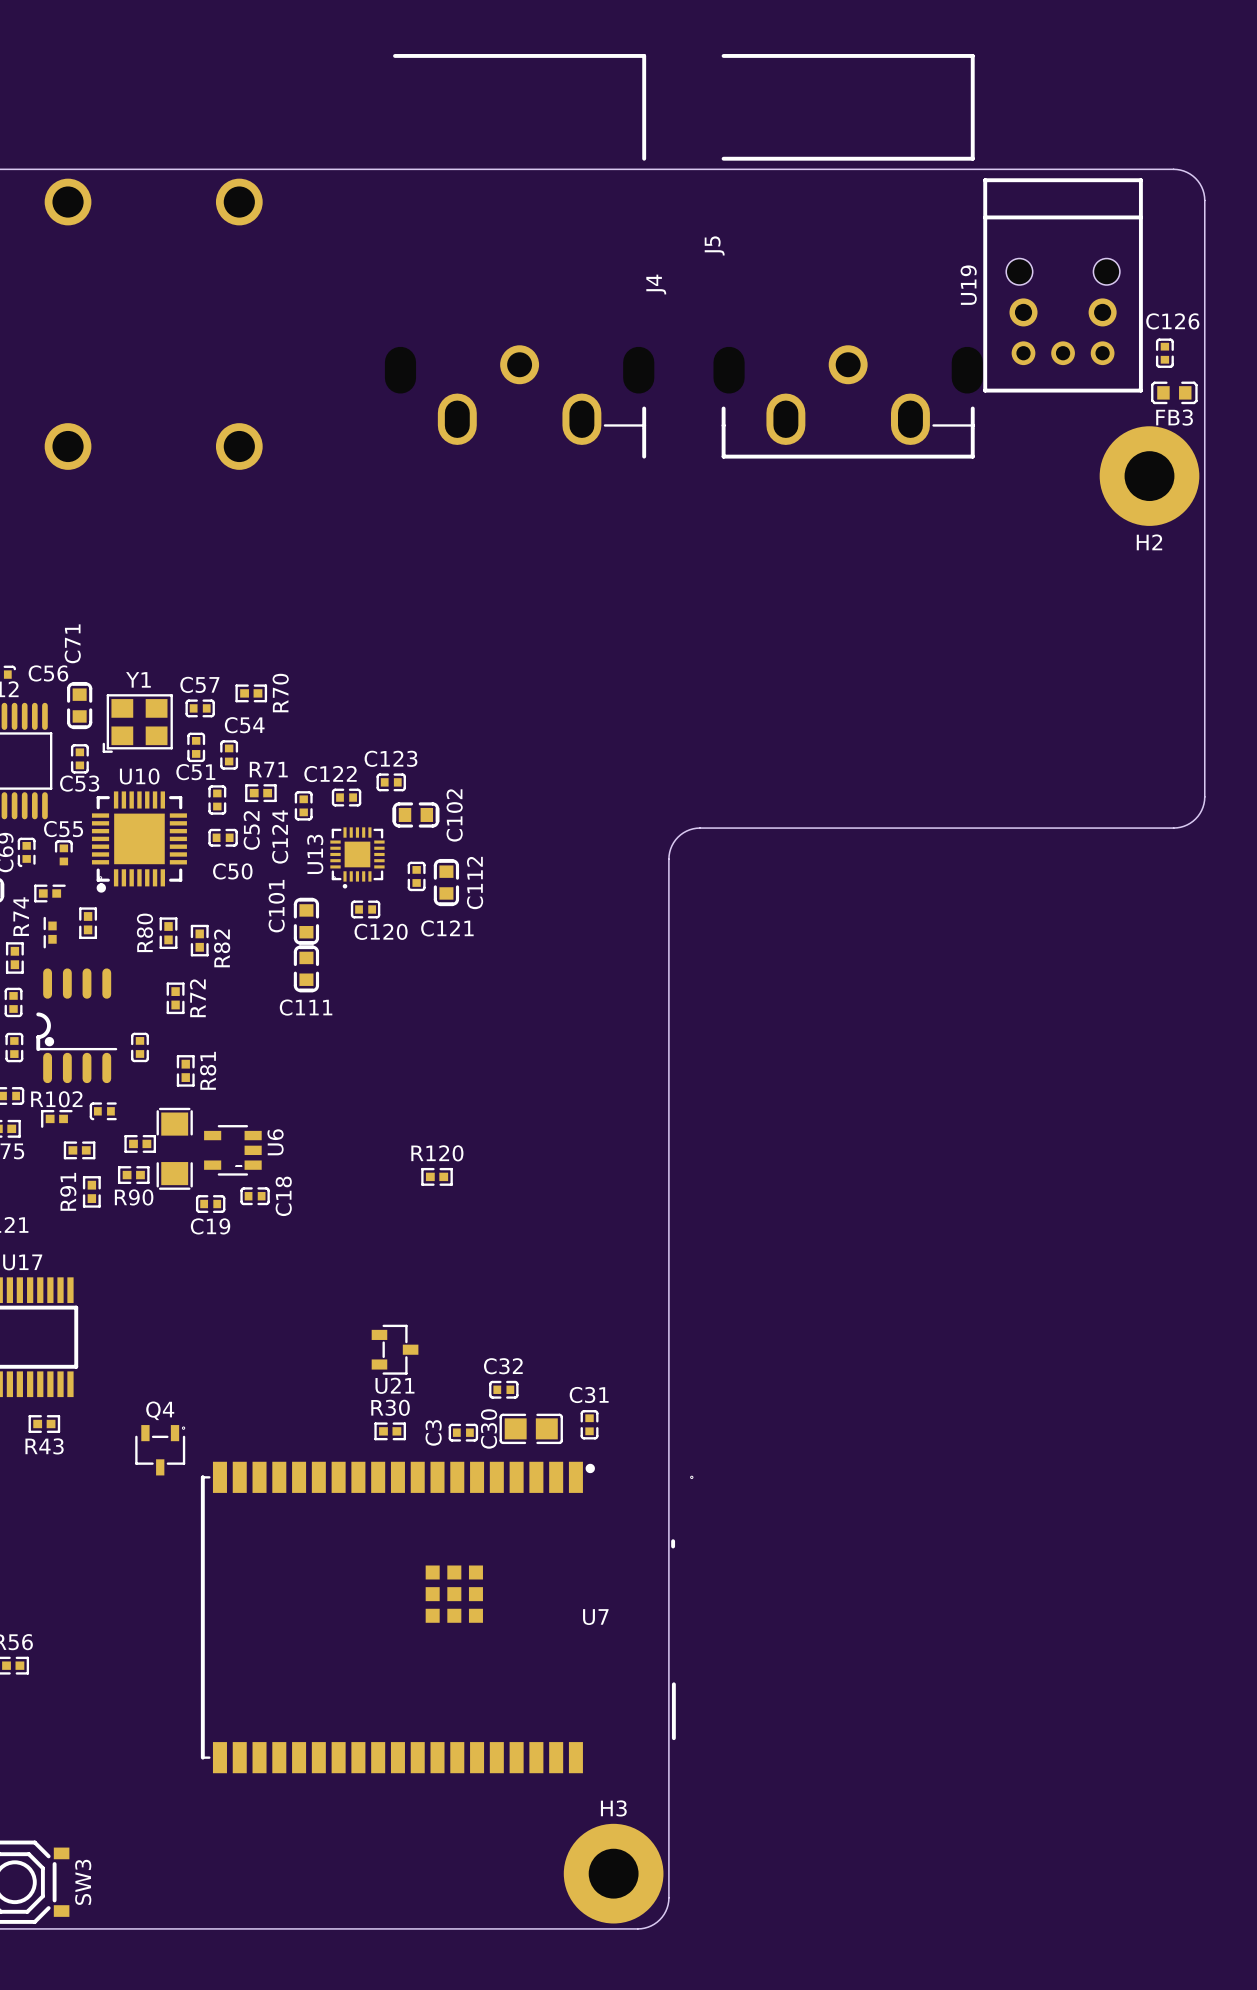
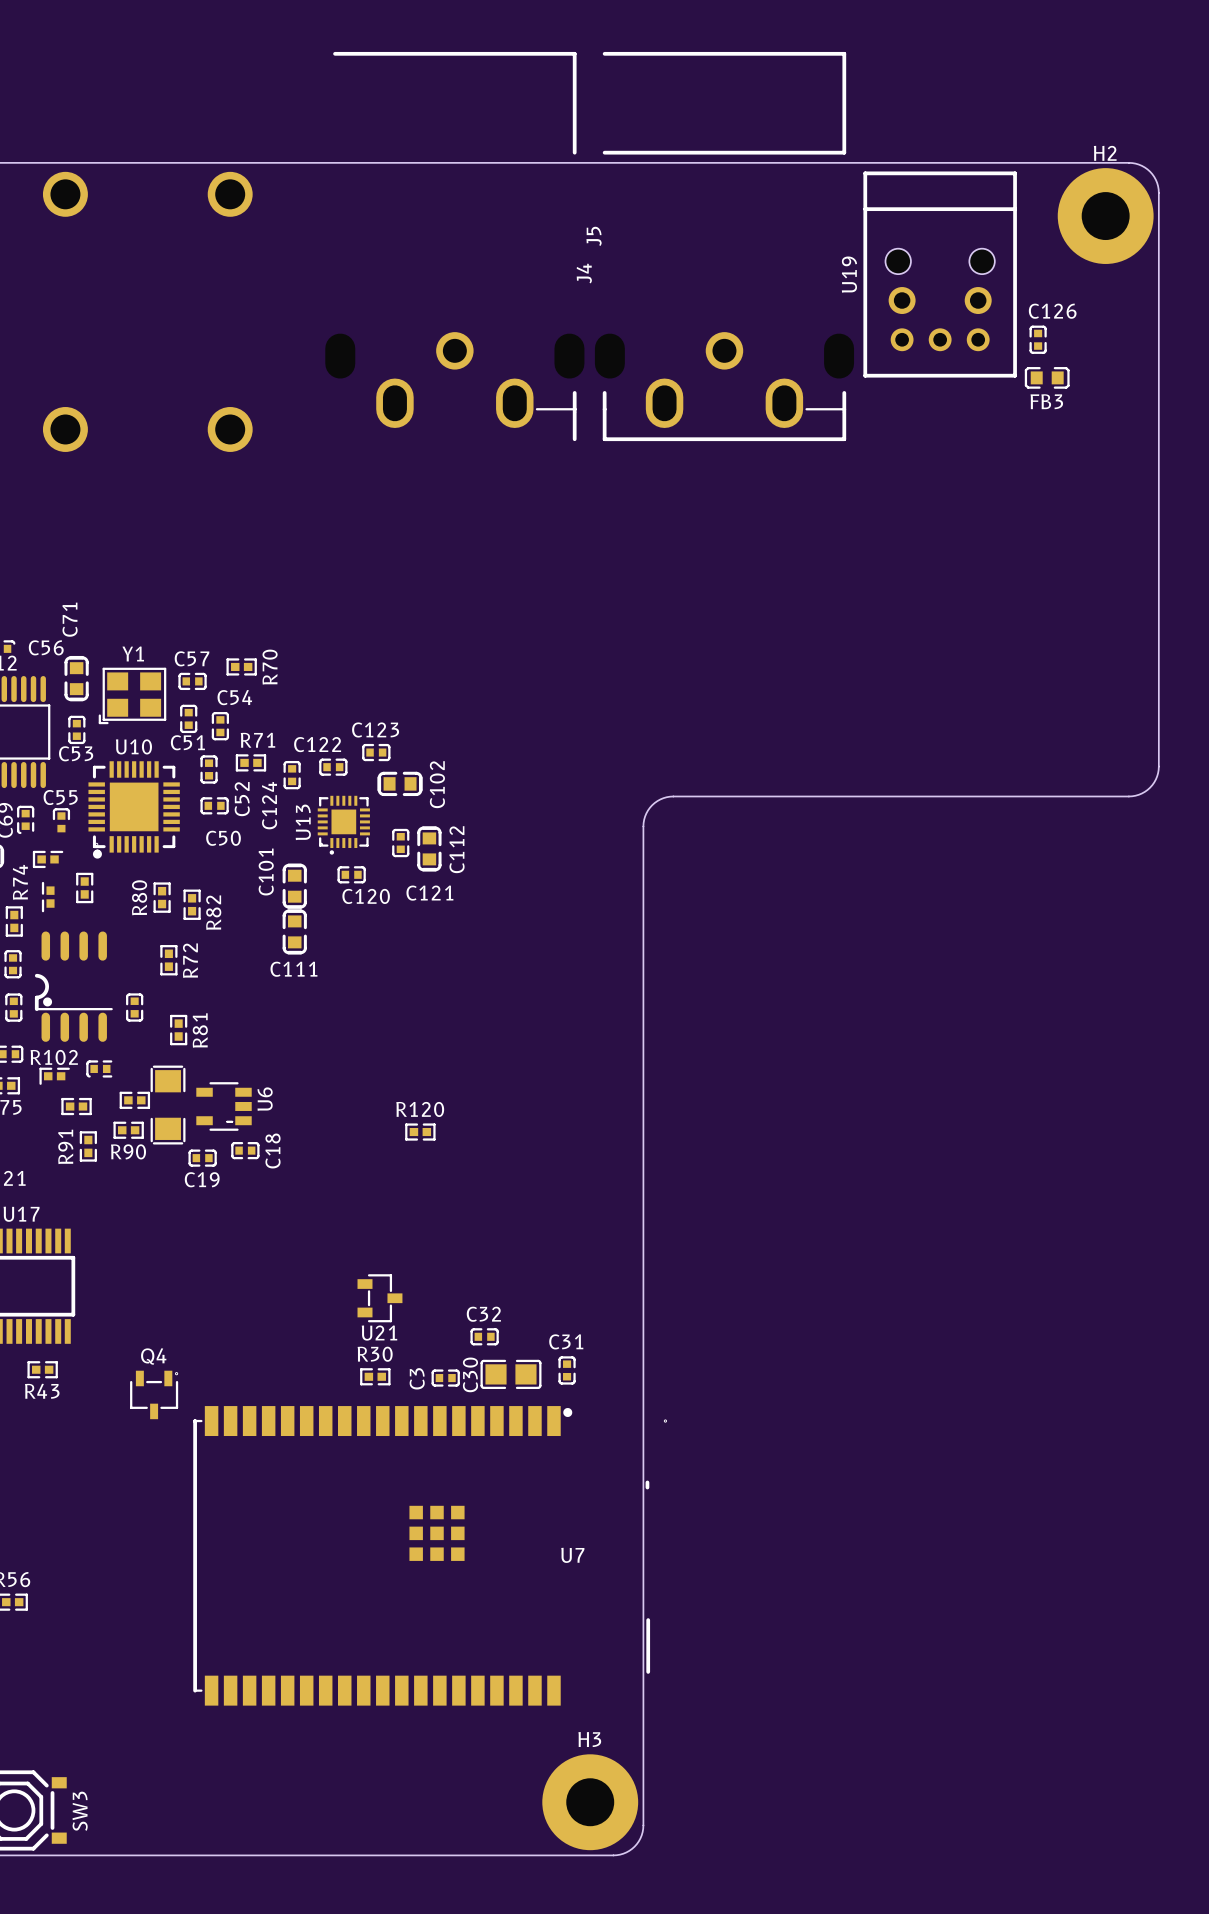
J4 position: (519, 256) -> (454, 246)
J5 position: (848, 256) -> (724, 246)
U19 position: (1063, 285) -> (940, 274)
C126 name position: C126 (1172, 321) -> C126 (1052, 311)
C126 position: (1164, 353) -> (1038, 339)
FB3 position: (1174, 392) -> (1047, 377)
H2 position: (1149, 476) -> (1105, 216)
H2 name position: H2 (1149, 542) -> H2 (1105, 153)

